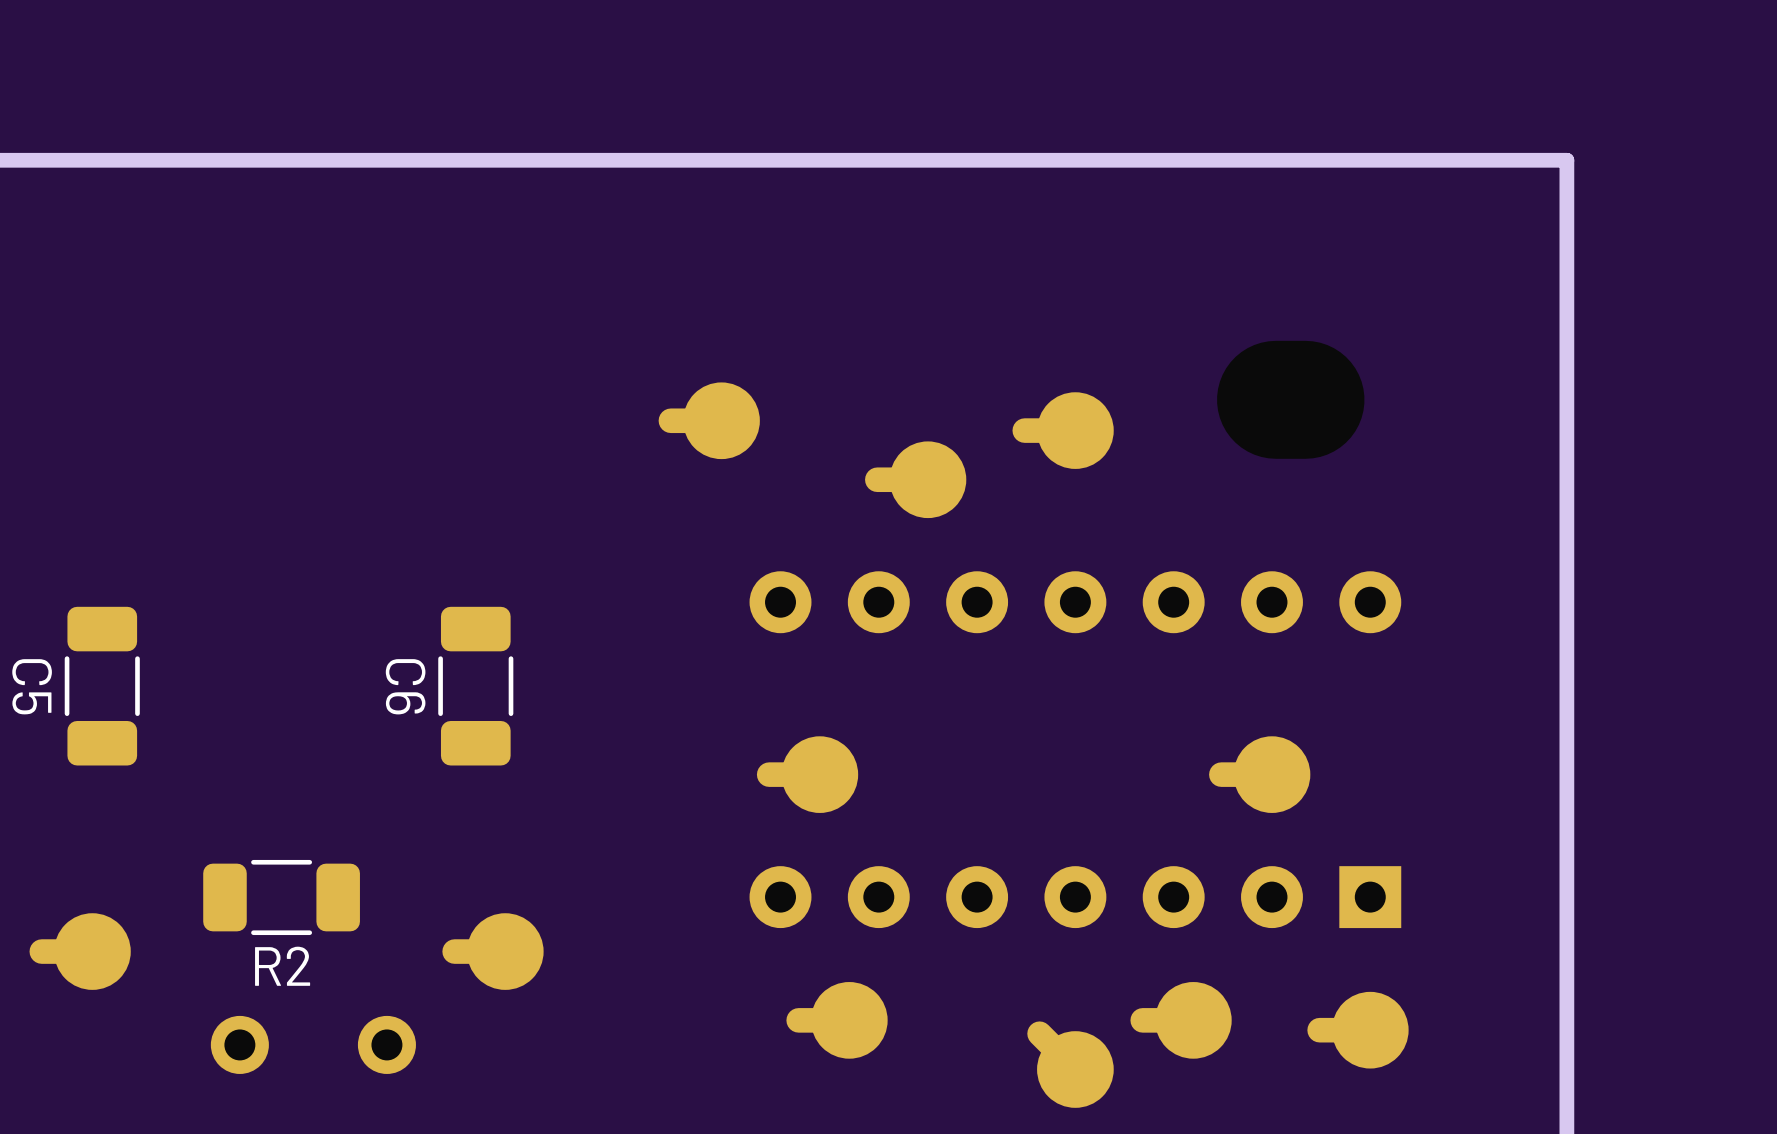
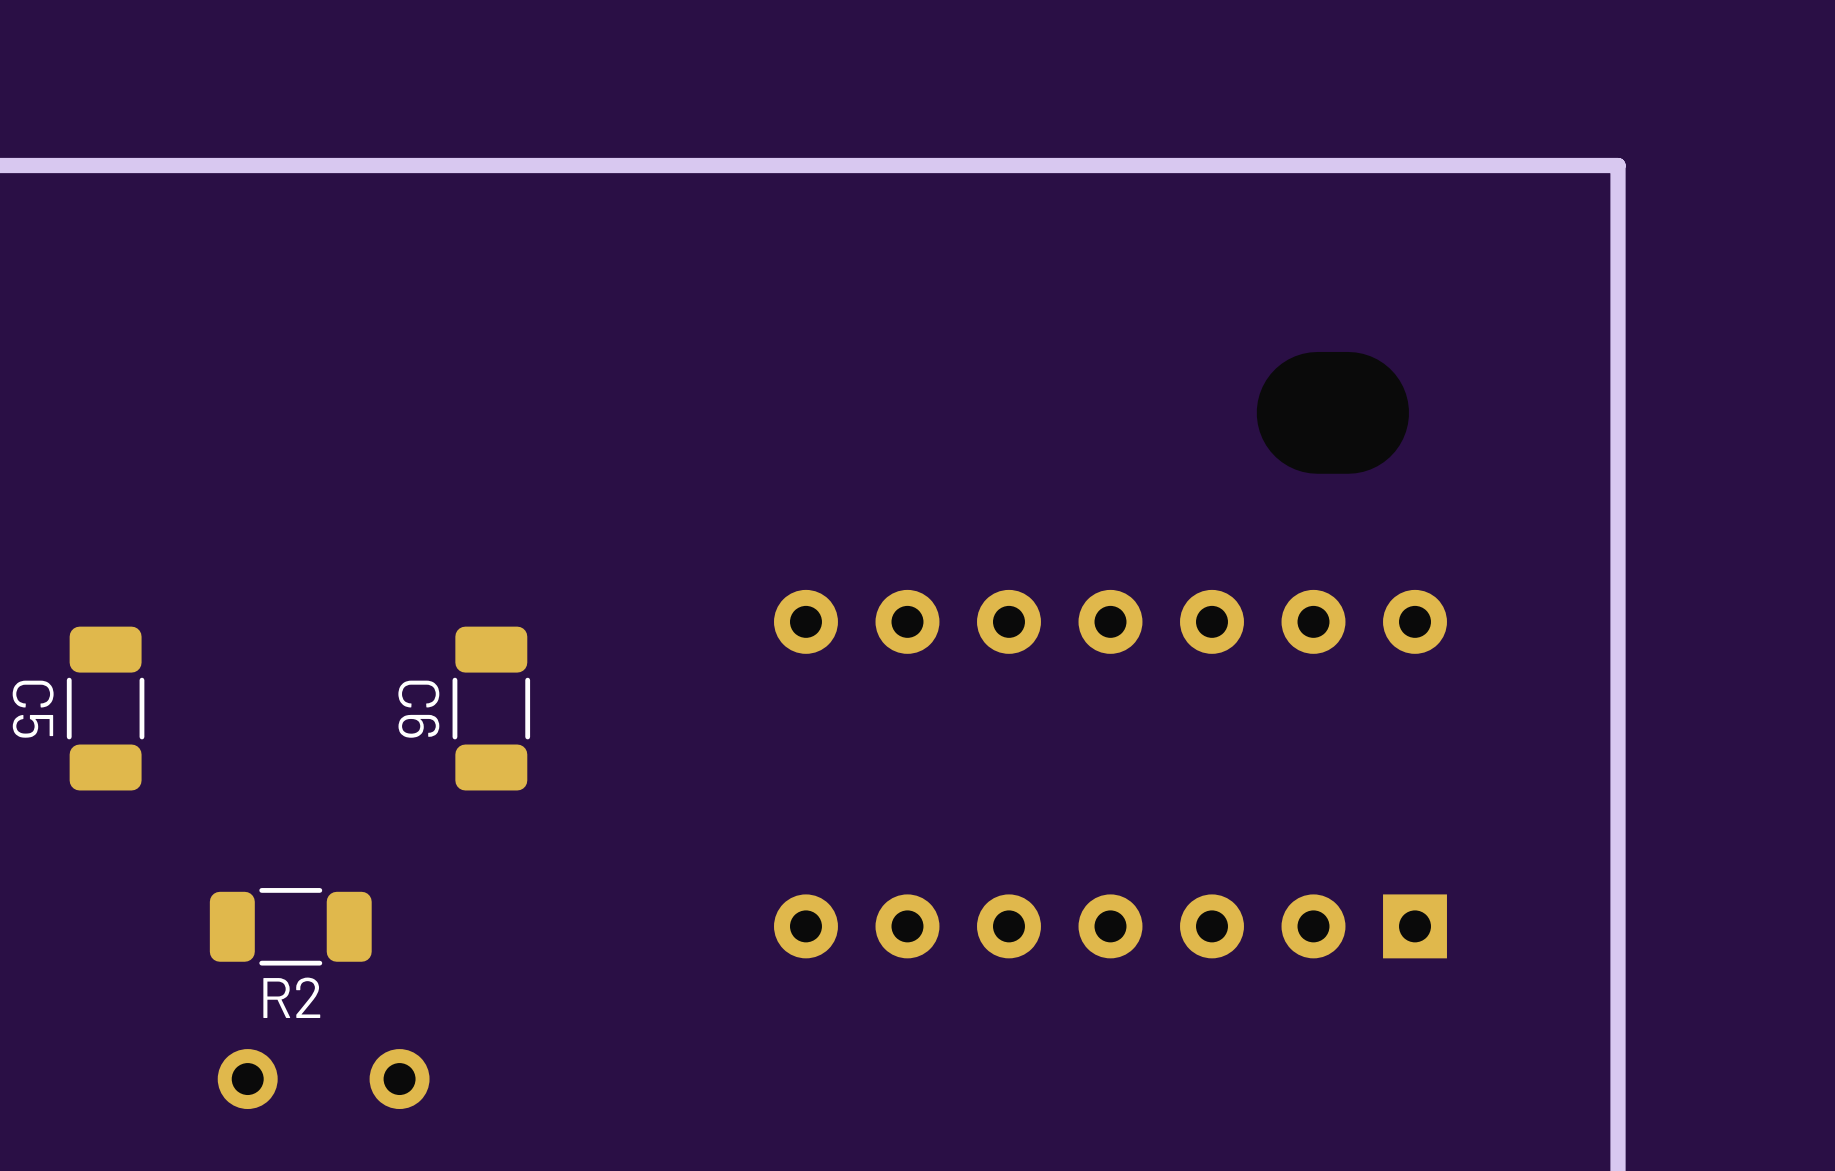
part: (709, 420) -> none
part: (1063, 430) -> none
part: (915, 479) -> none
part: (807, 774) -> none
part: (1259, 774) -> none
part: (80, 951) -> none
part: (492, 951) -> none
part: (837, 1020) -> none
part: (1181, 1020) -> none
part: (1357, 1030) -> none
part: (1070, 1064) -> none

